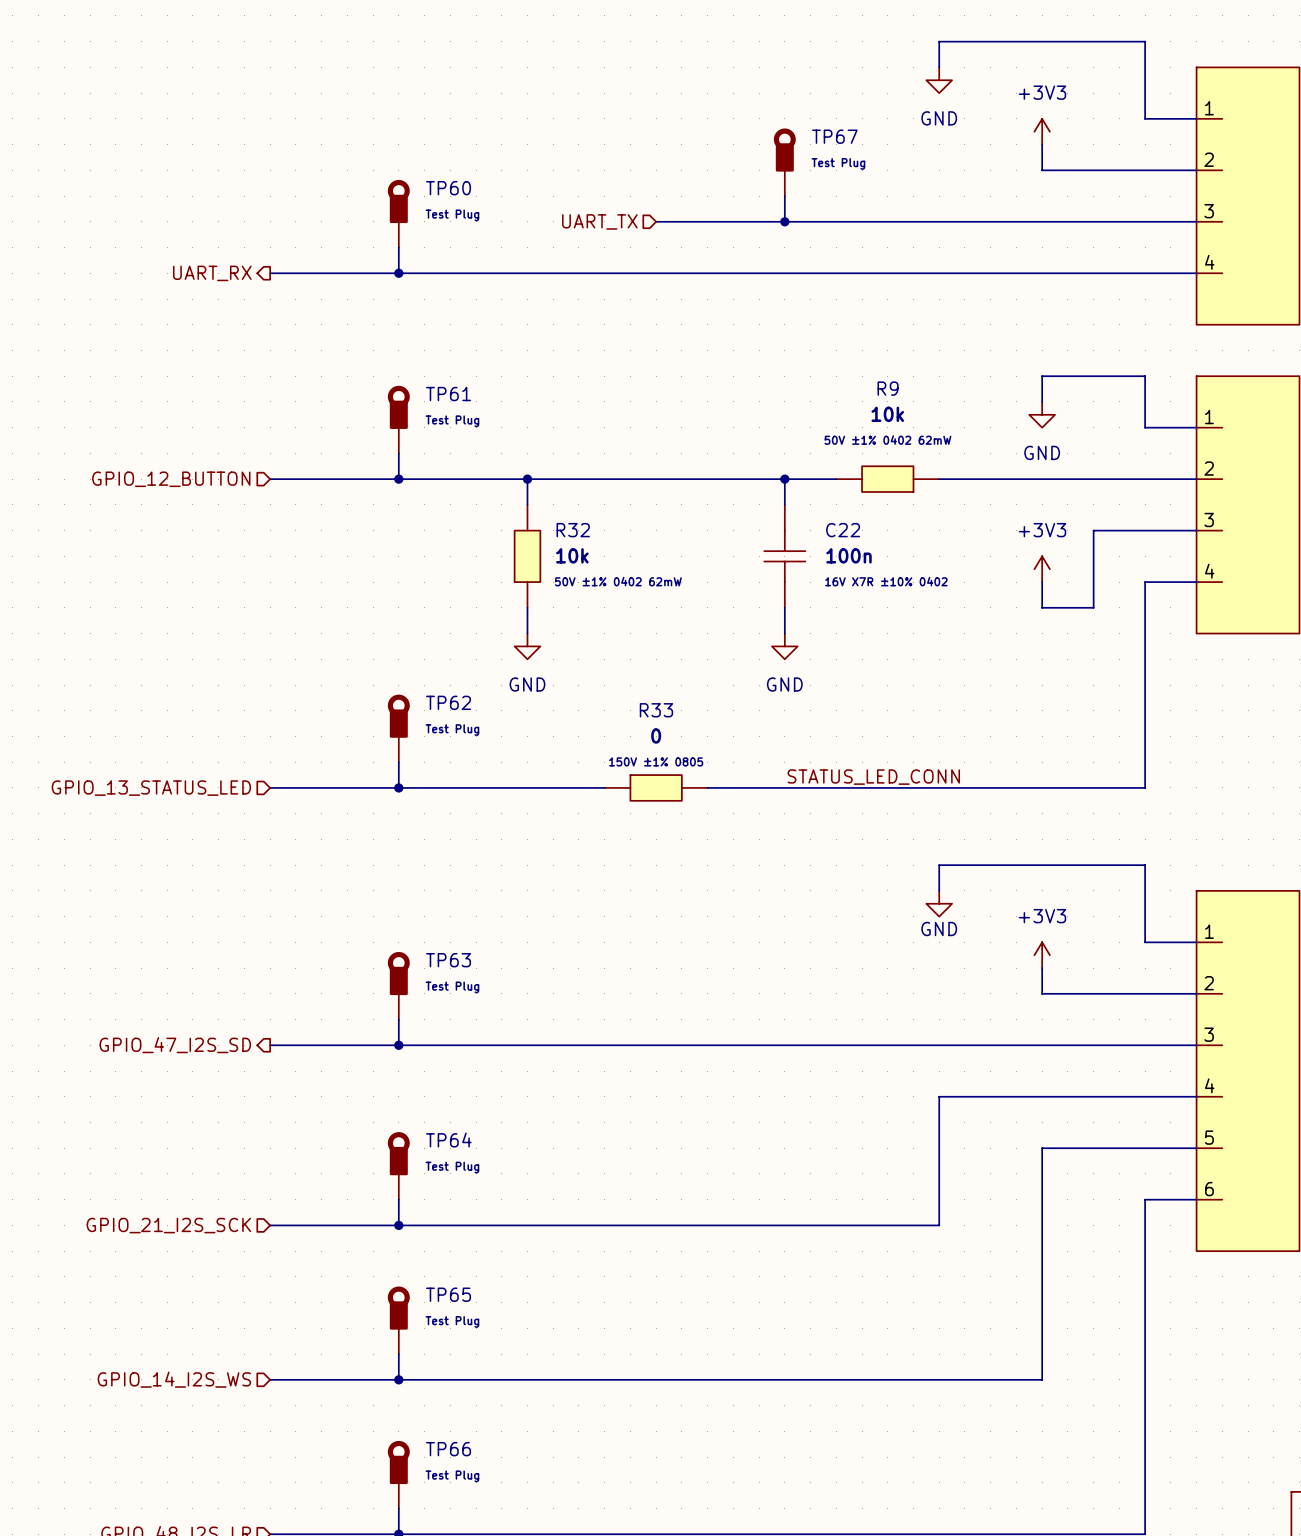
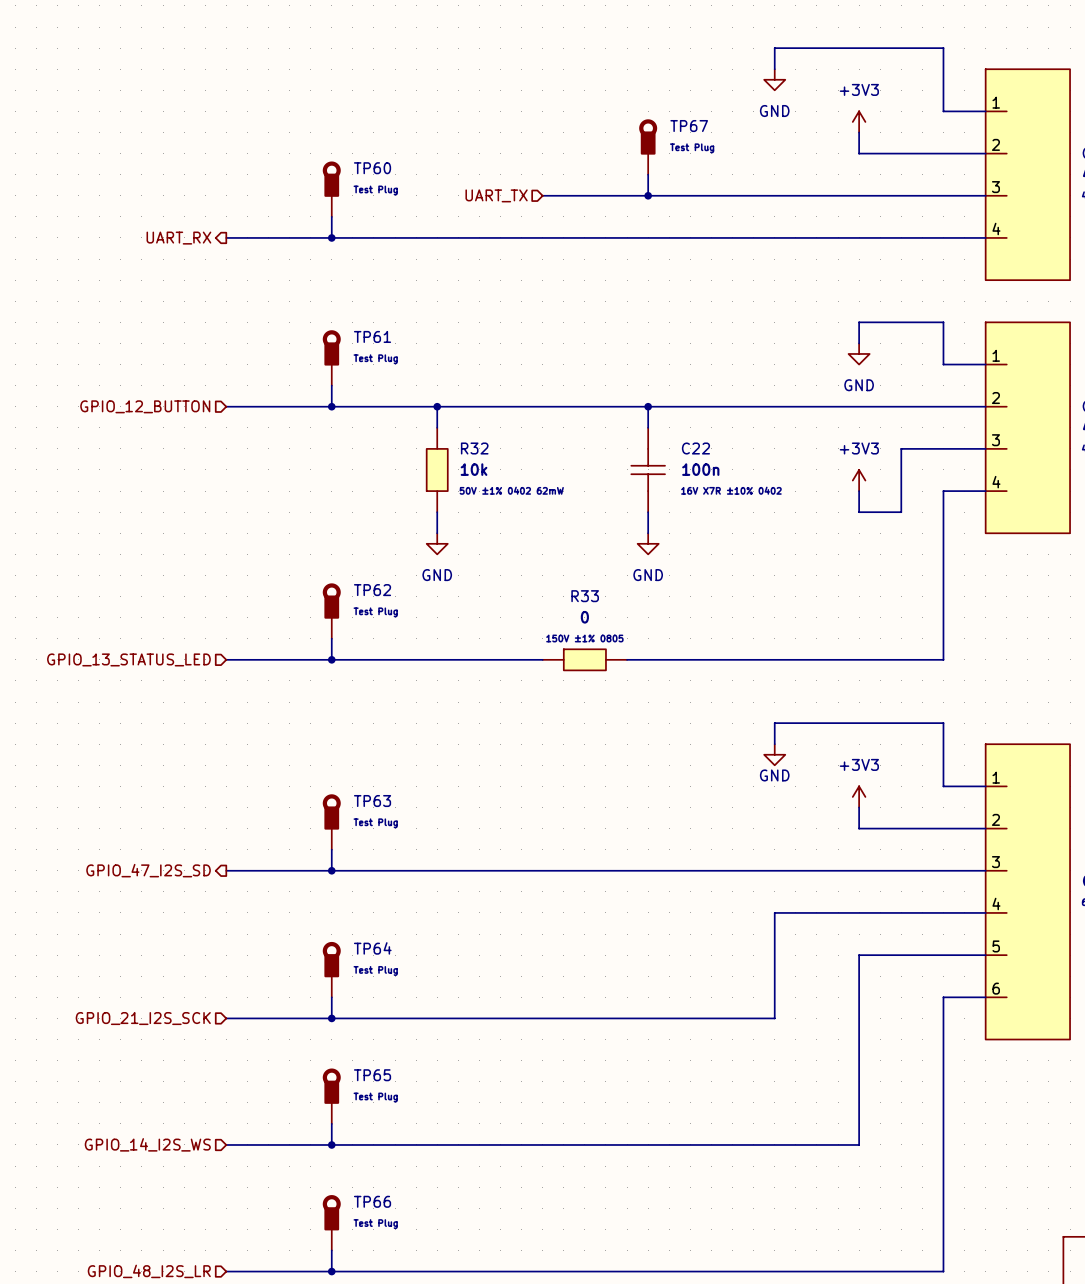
R9: 10k (887, 479) -> none
label: STATUS_LED_CONN (873, 777) -> none
R33 position: (656, 787) -> (584, 659)

